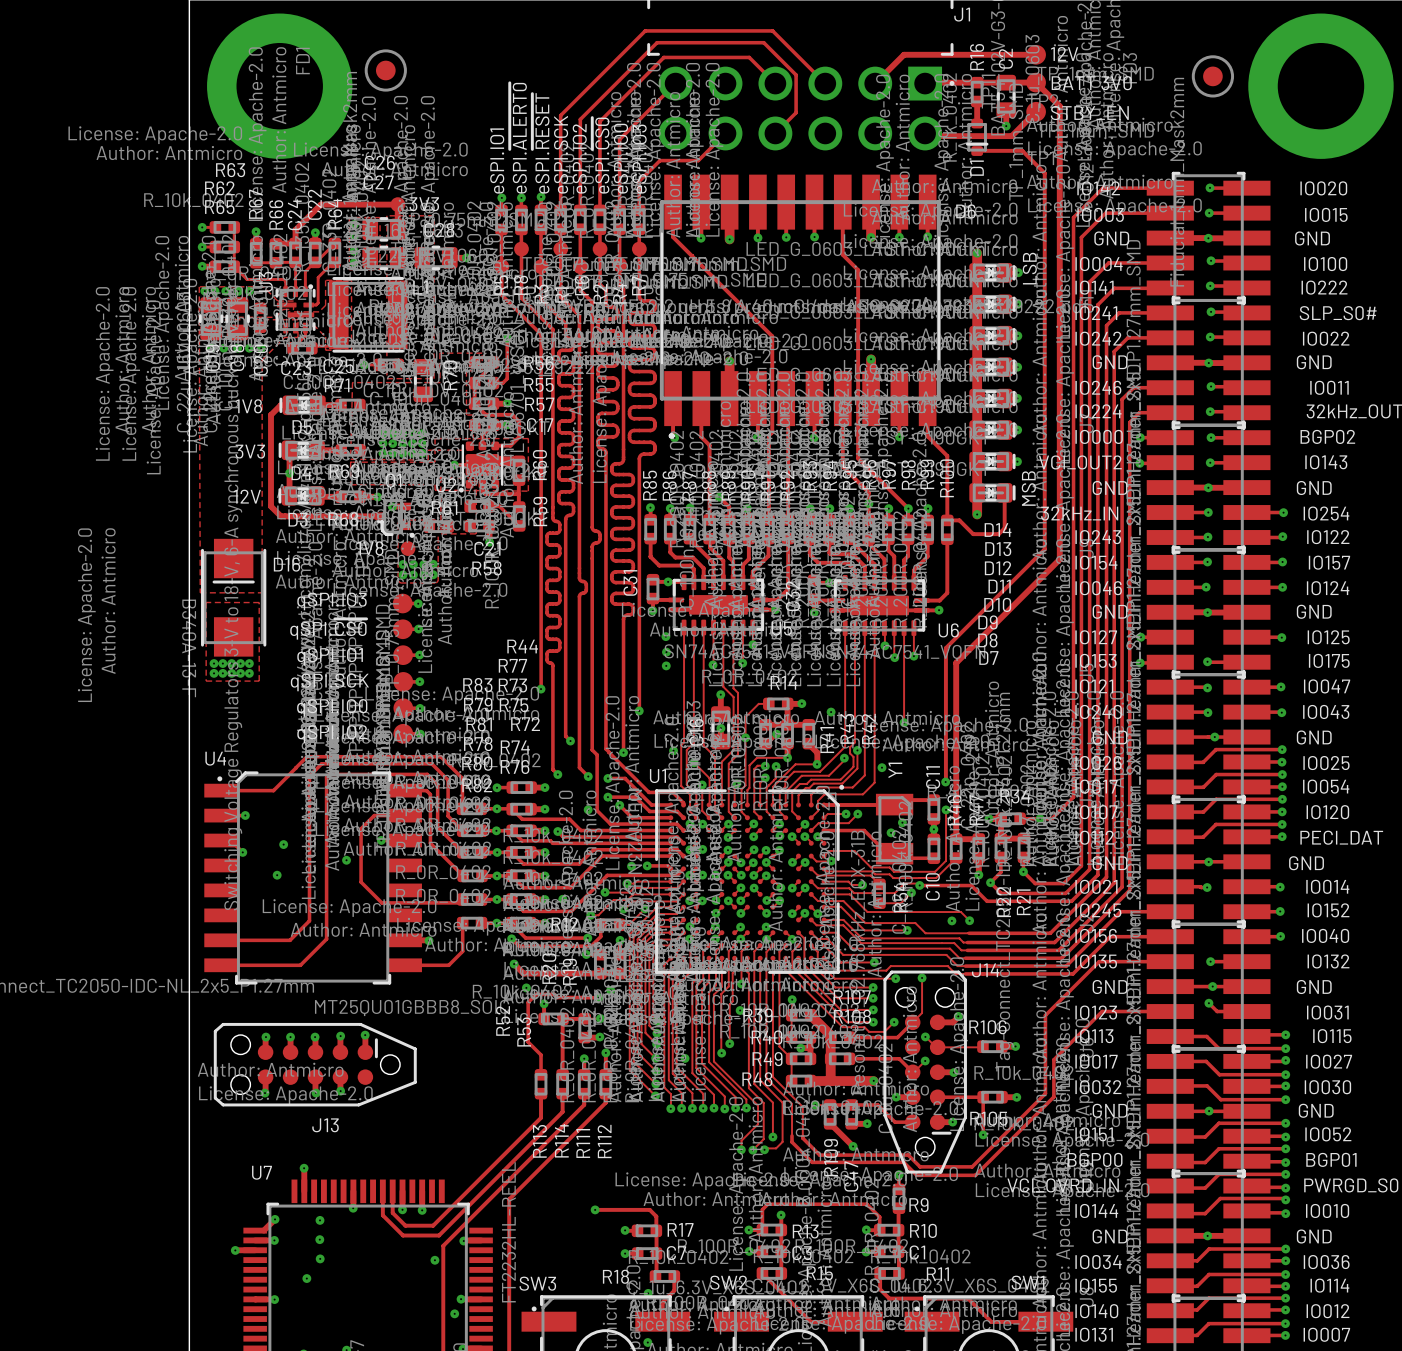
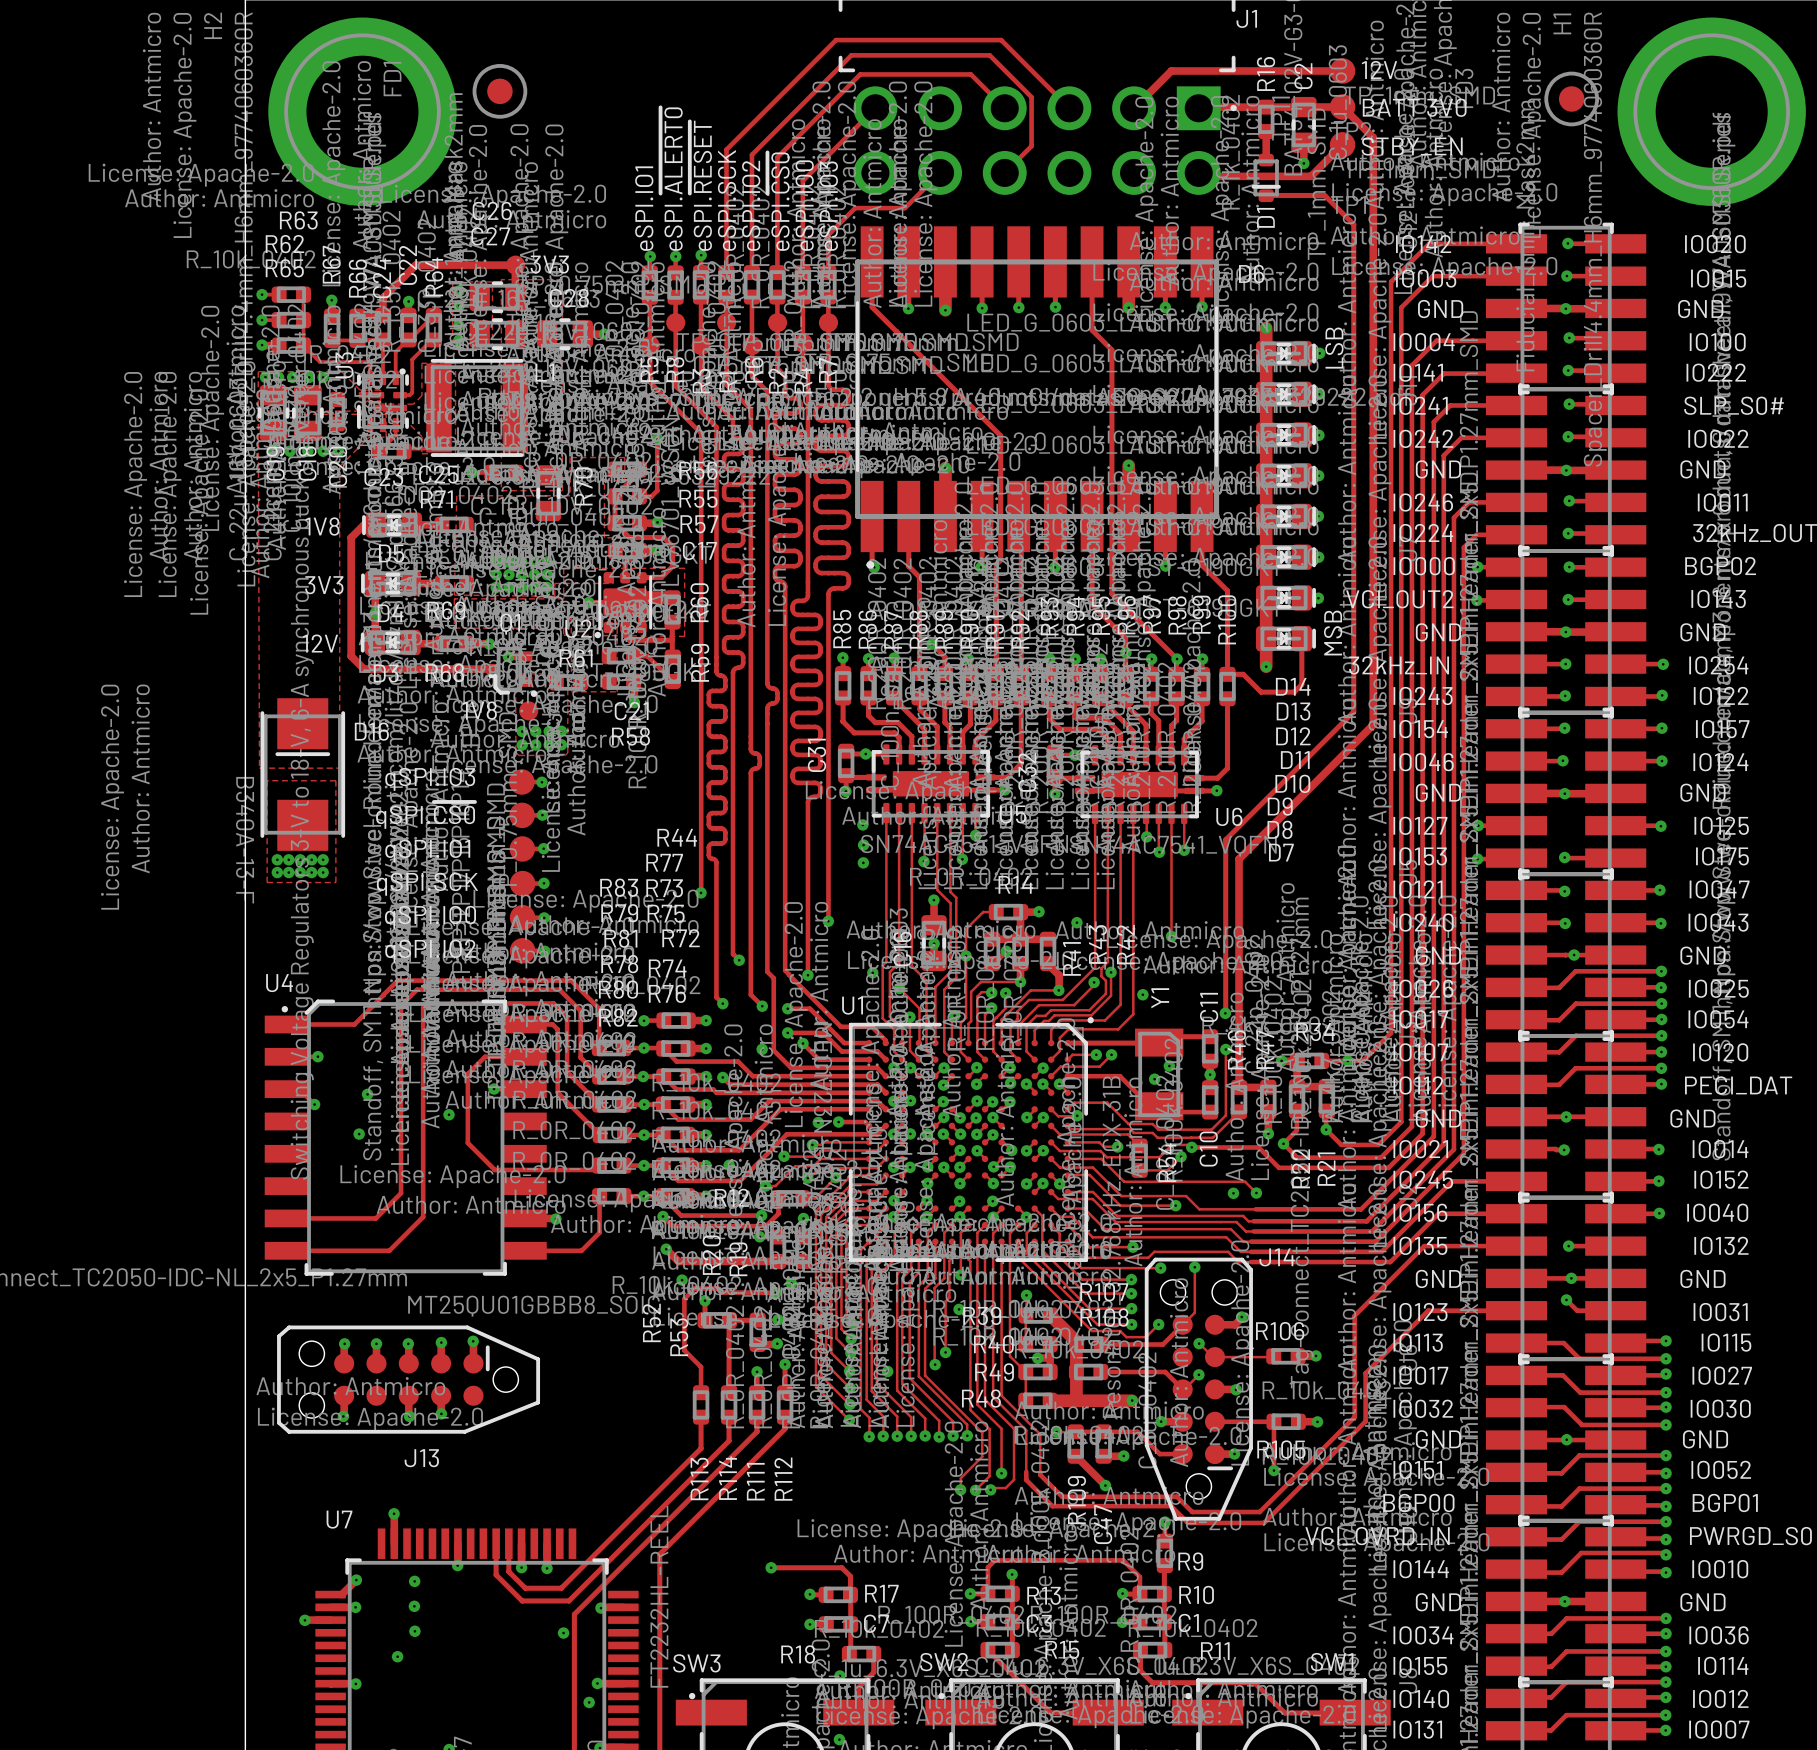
H2 side: bottom (279, 86) -> top (362, 111)
H1 side: bottom (1320, 86) -> top (1711, 111)

